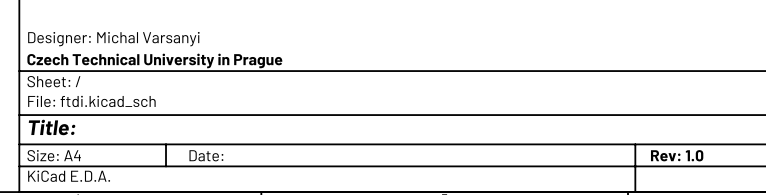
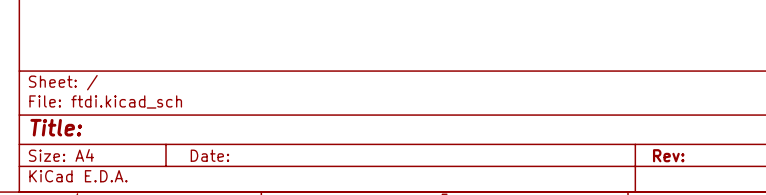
title block: Designer: Michal Varsanyi (113, 39) -> none
title block: Czech Technical University in Prague (154, 60) -> none
title block: Rev: 1.0 (677, 155) -> Rev: (668, 155)

